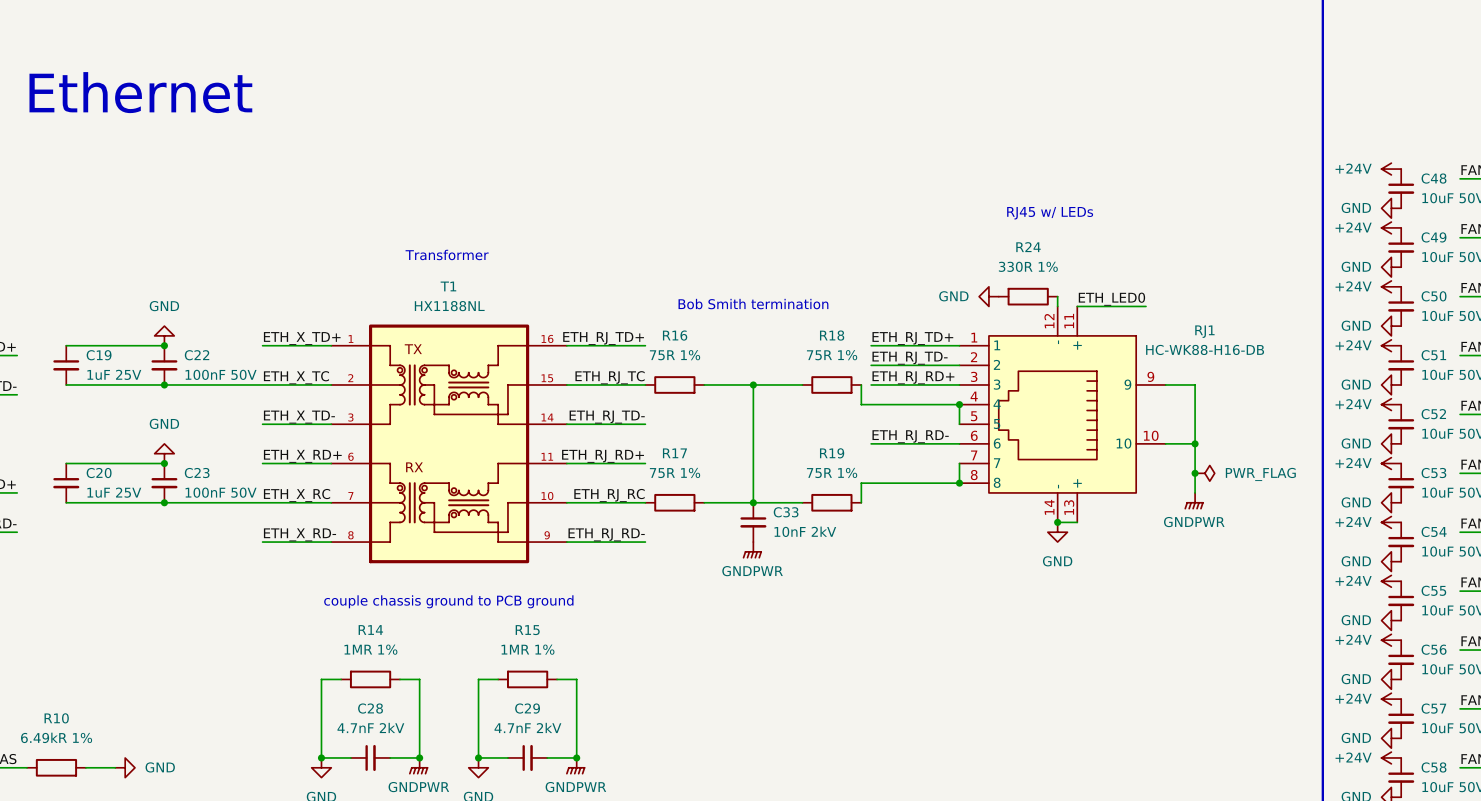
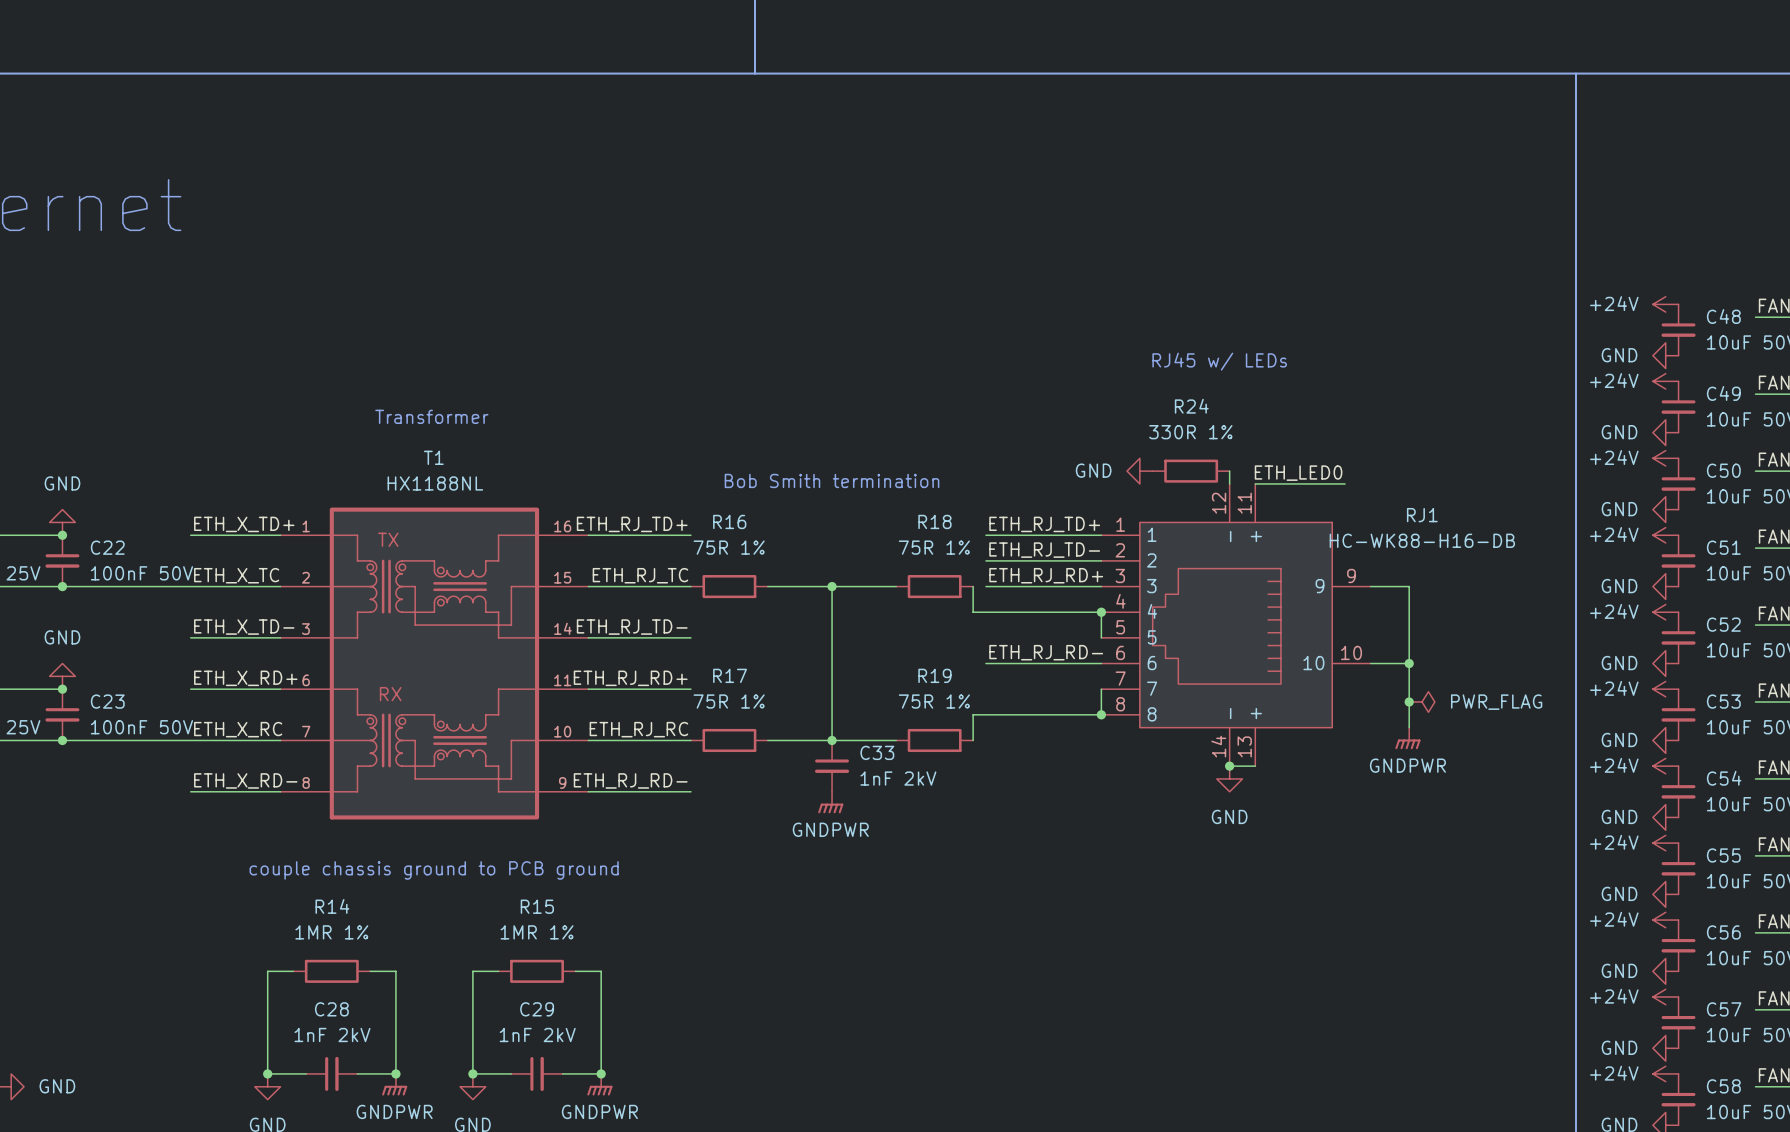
C33 value: 10nF 2kV (805, 531) -> 1nF 2kV (898, 778)
C28 value: 4.7nF 2kV (370, 727) -> 1nF 2kV (332, 1035)
C29 value: 4.7nF 2kV (527, 727) -> 1nF 2kV (537, 1035)

